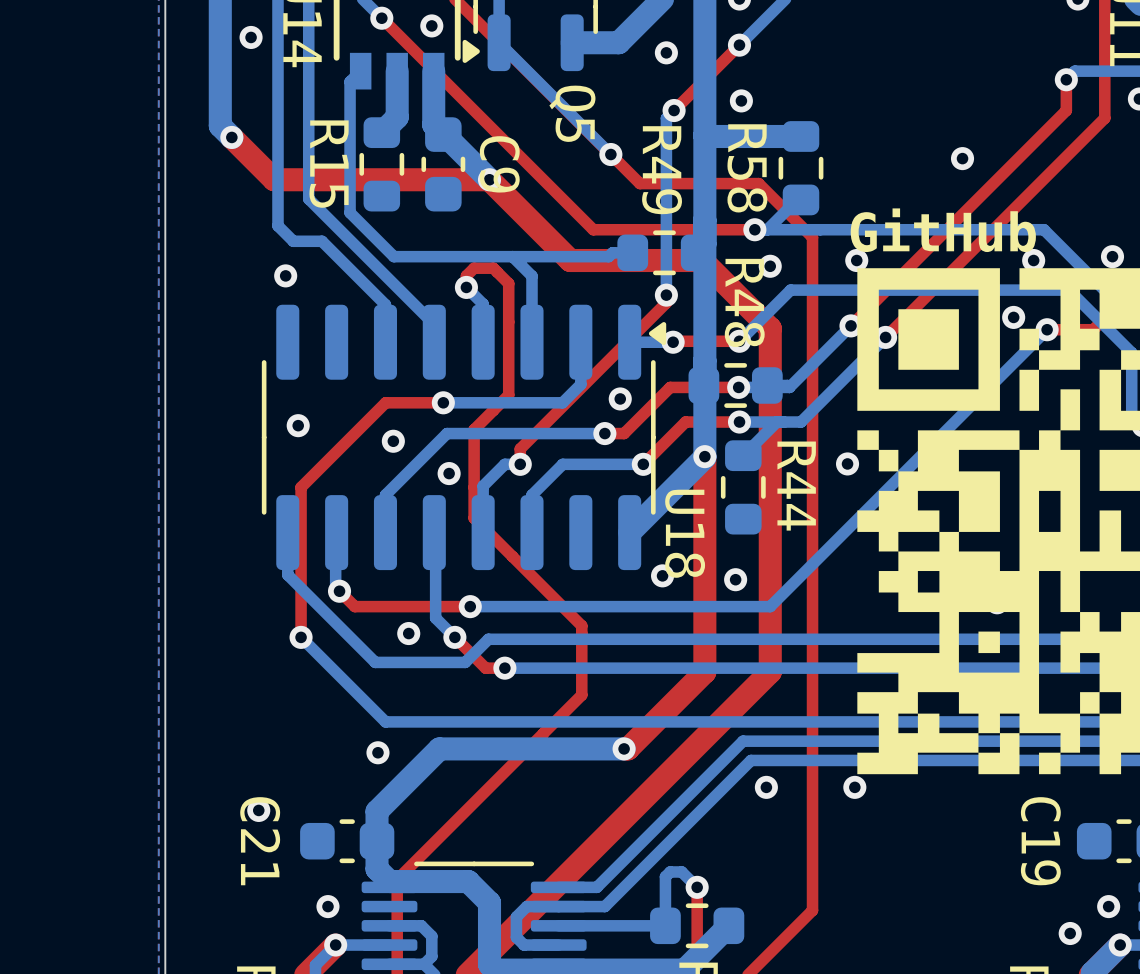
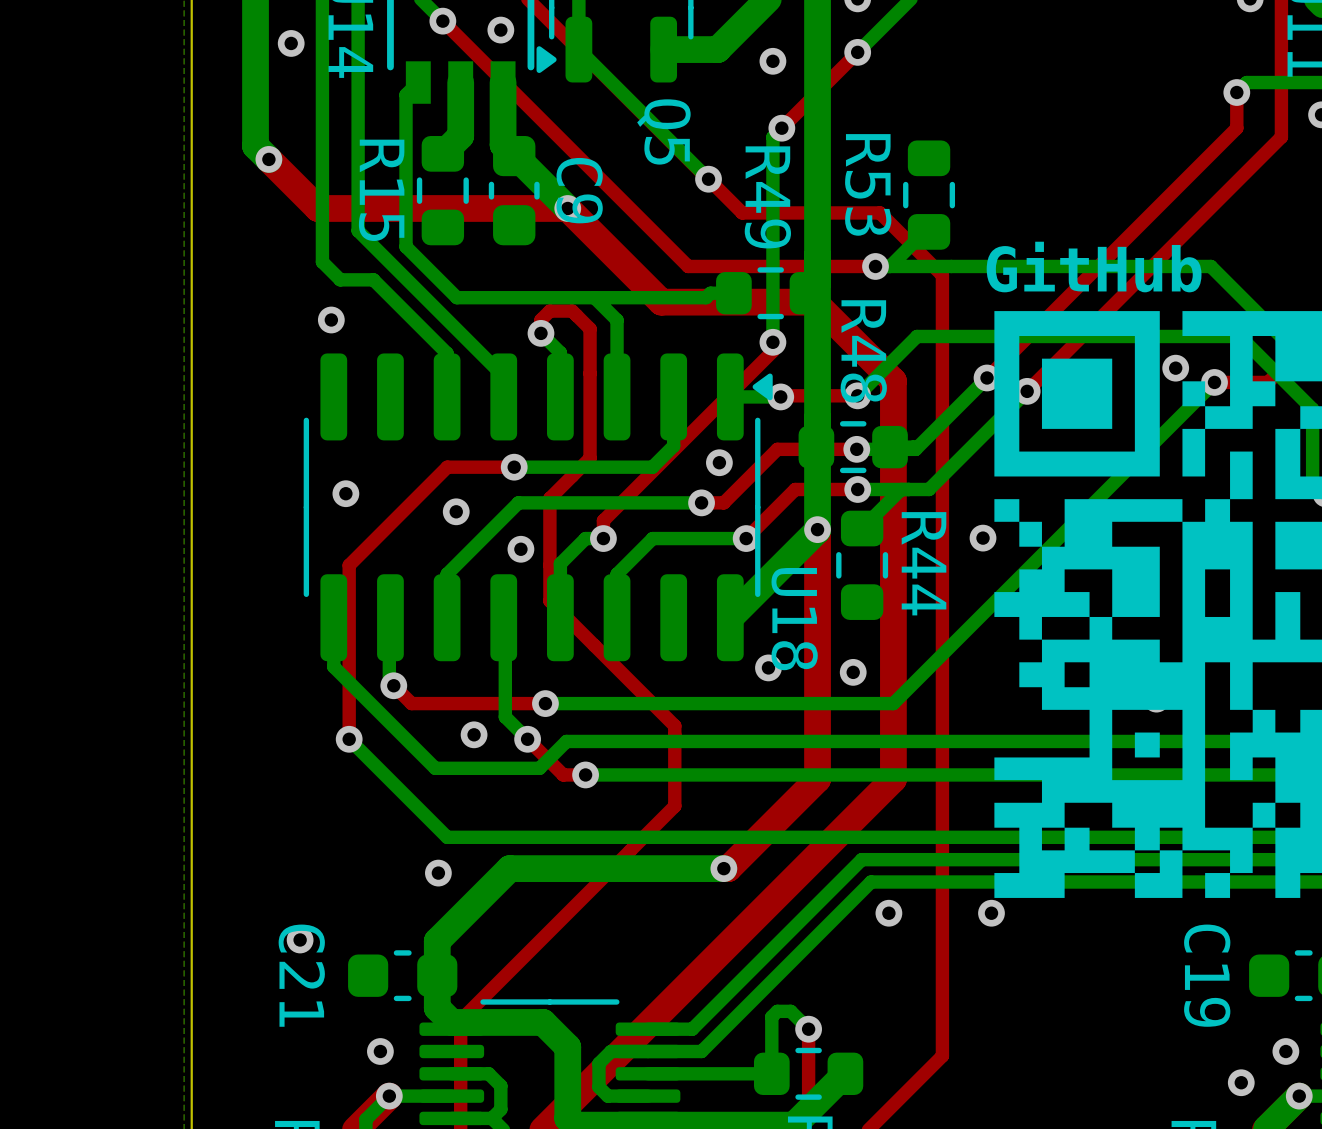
via: (741, 100) -> none
bottom track: (704, 135) (801, 136) -> none
via: (962, 158) -> none
R58 name: R58 (747, 168) -> R53 (868, 184)
via: (1112, 256) -> none
via: (856, 260) -> none
via: (1033, 260) -> none
via: (770, 266) -> none

